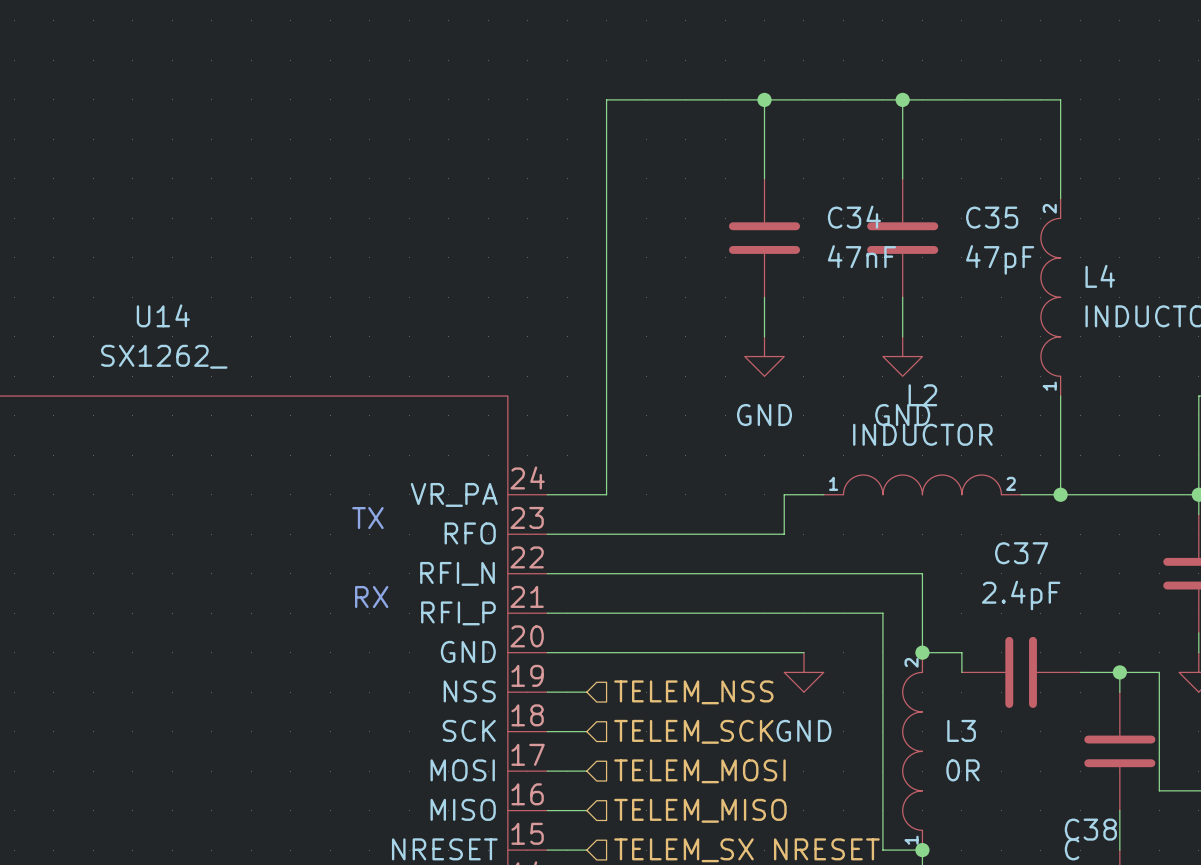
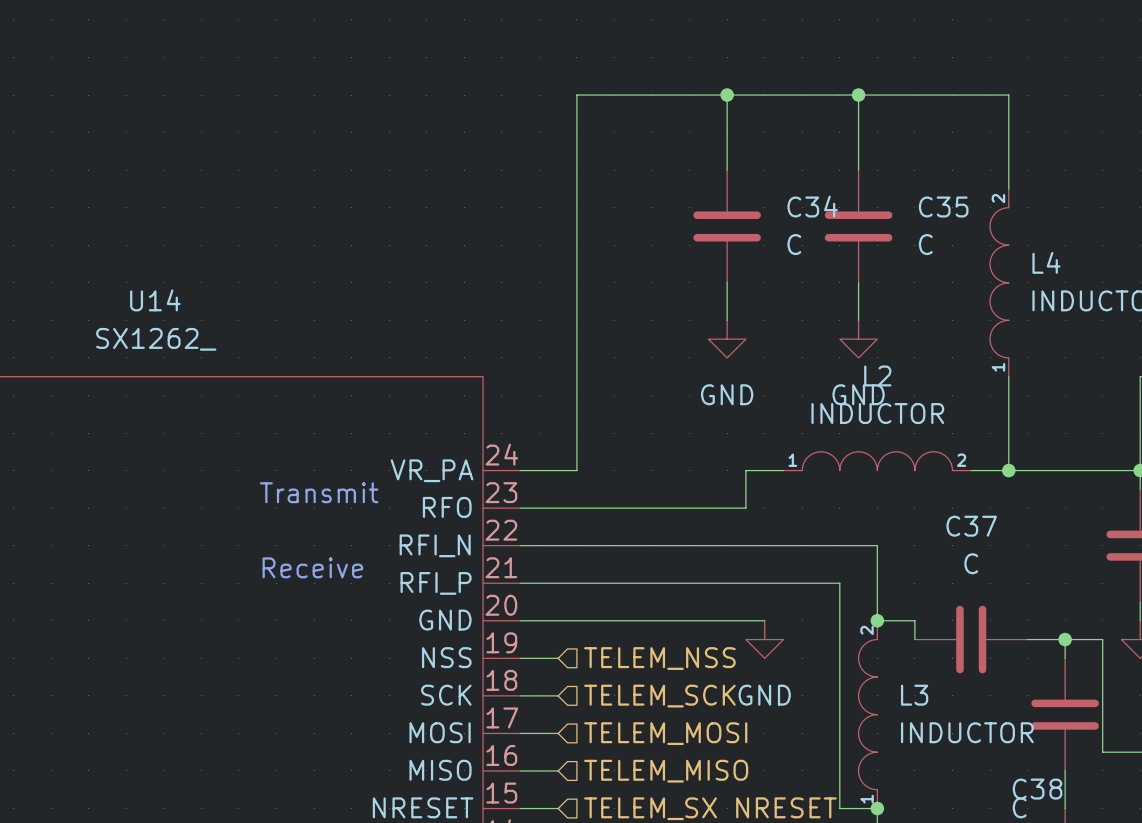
C34 value: 47nF (861, 256) -> C (794, 244)
C35 value: 47pF (1000, 259) -> C (925, 244)
text: none -> Transmit (319, 492)
text: TX (367, 518) -> none
C37 value: 2.4pF (1021, 595) -> C (971, 563)
text: none -> Receive (312, 567)
text: RX (371, 597) -> none
L3 value: 0R (963, 770) -> INDUCTOR (967, 732)

